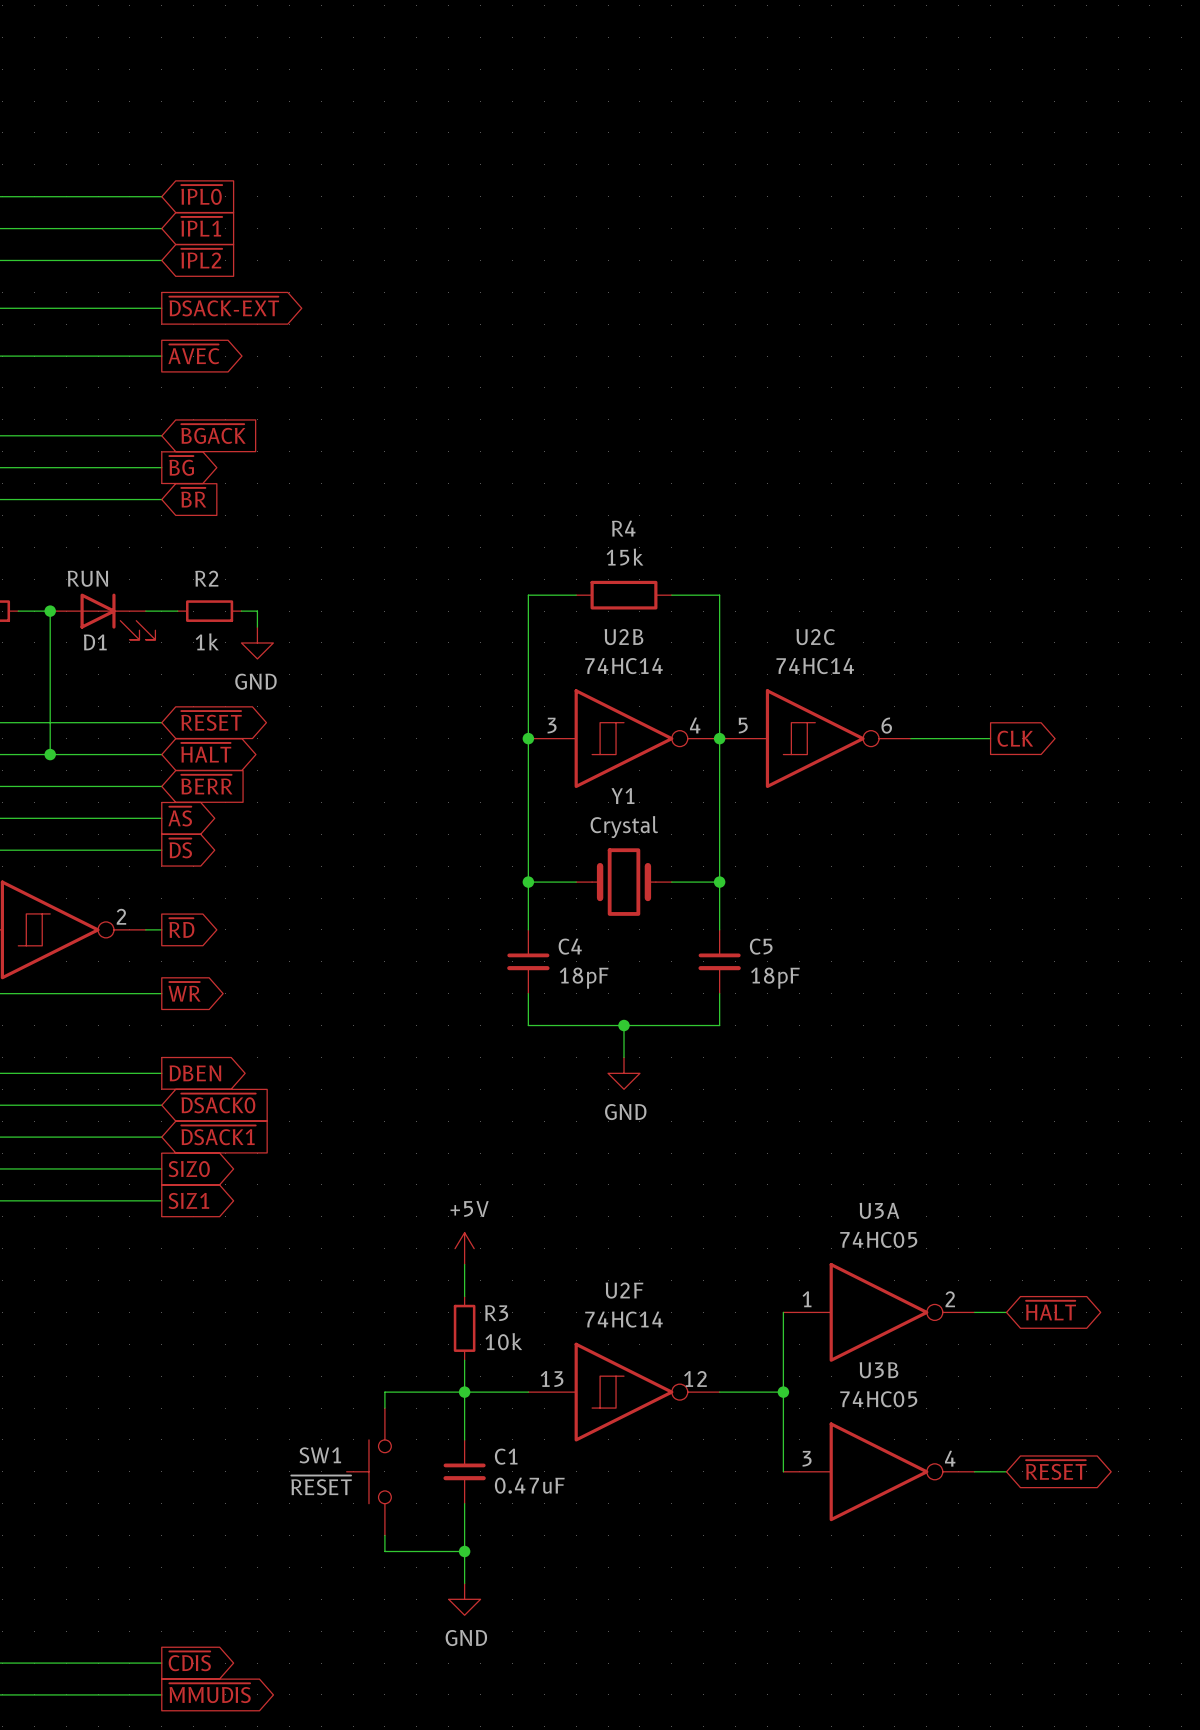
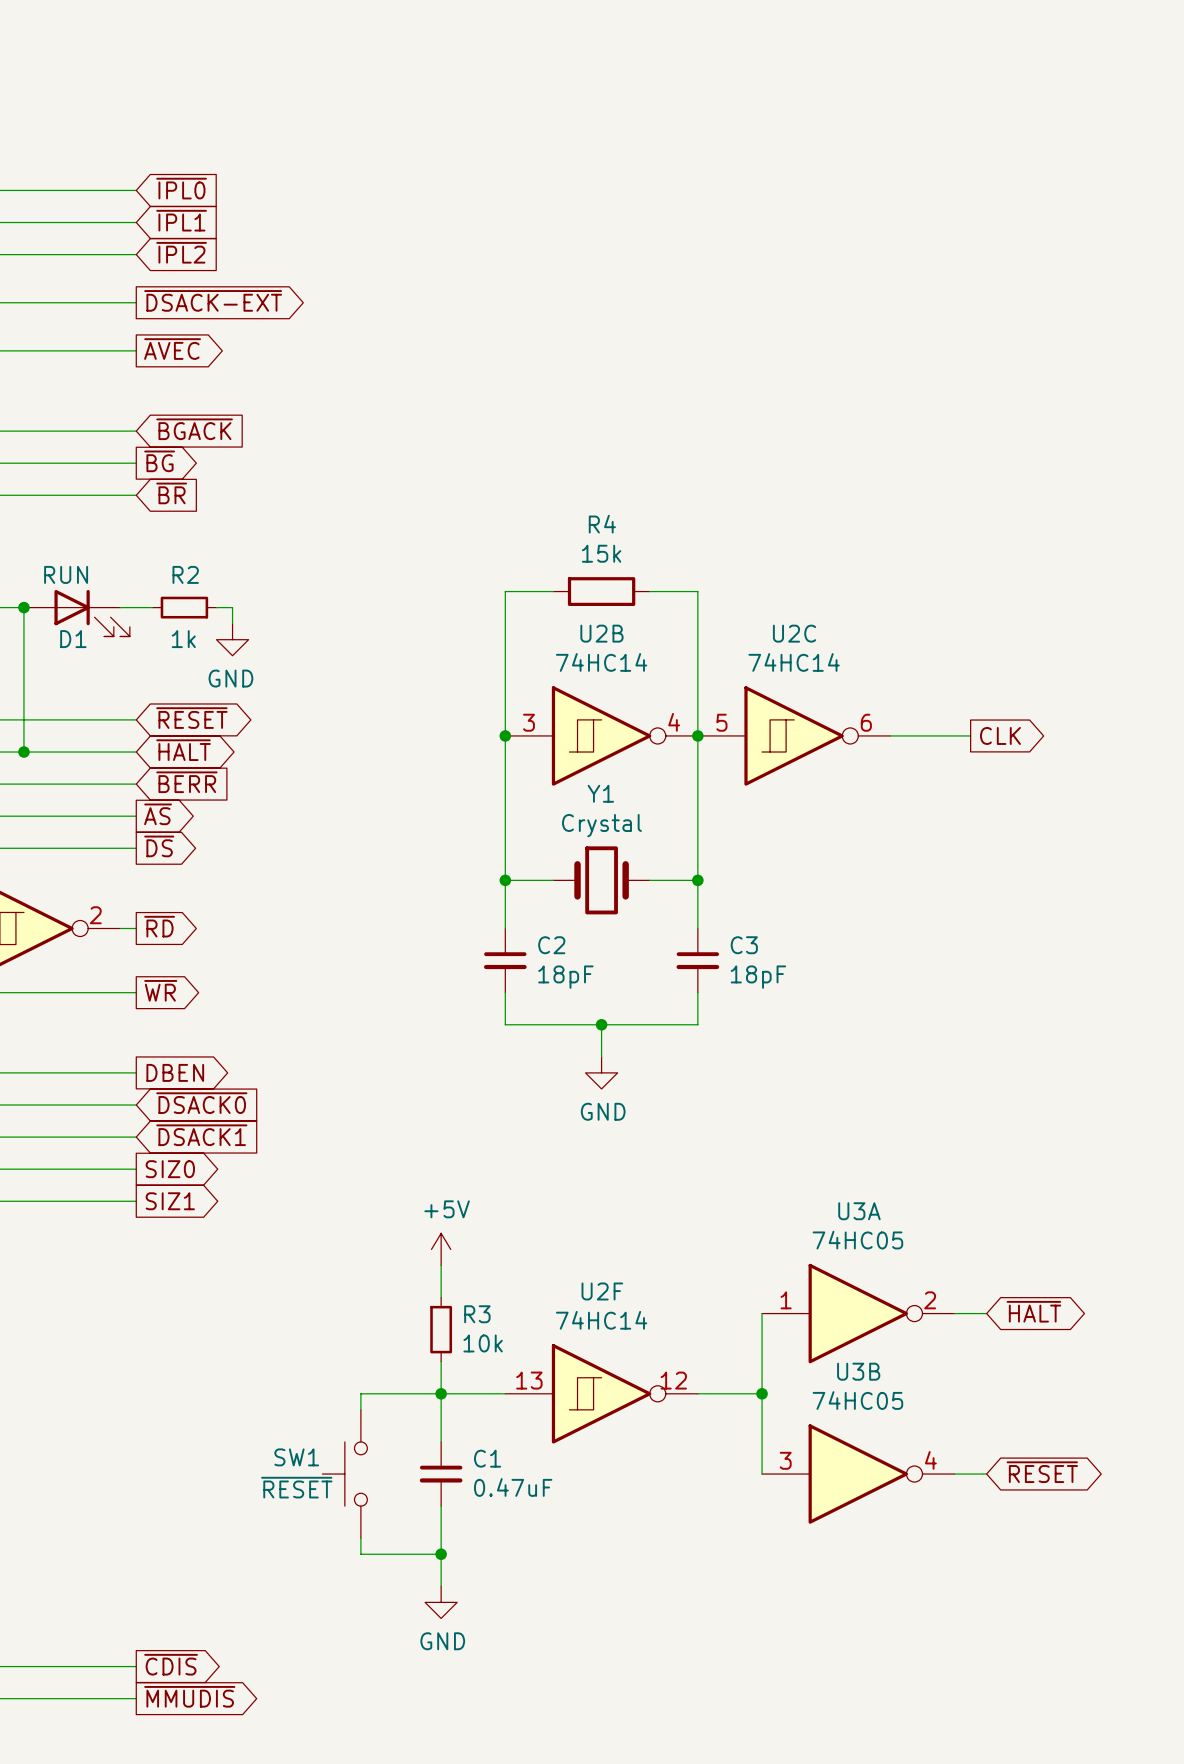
C4 name: C4 (570, 946) -> C2 (551, 945)
C5 name: C5 (761, 946) -> C3 (744, 945)

